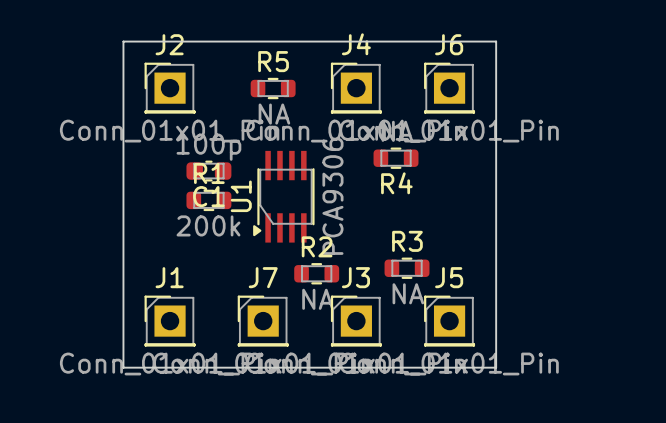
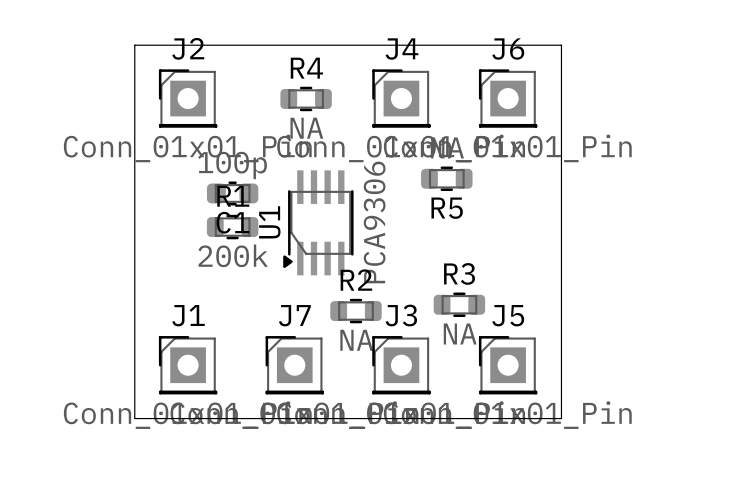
R5 name: R5 (273, 61) -> R4 (306, 68)
R4 name: R4 (396, 183) -> R5 (447, 208)

